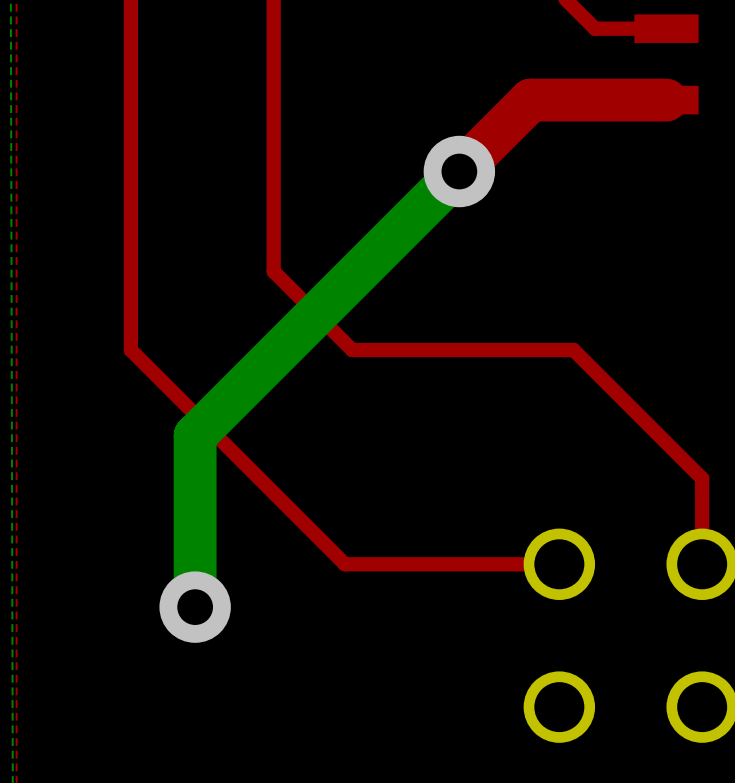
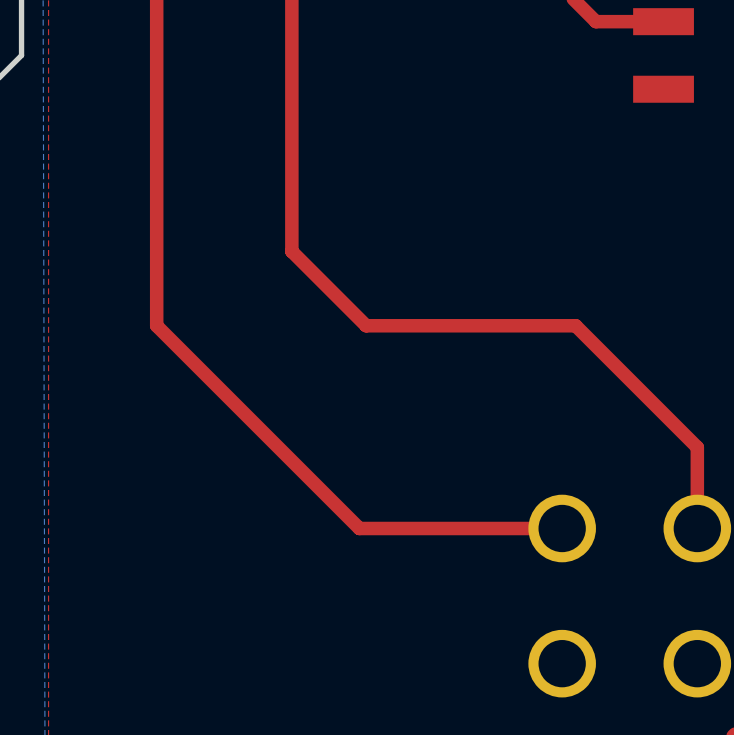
top track: (666, 100) (530, 100) (459, 171) -> none
bottom track: (459, 171) (195, 435) (195, 607) -> none
via: (459, 171) -> none
via: (195, 607) -> none

